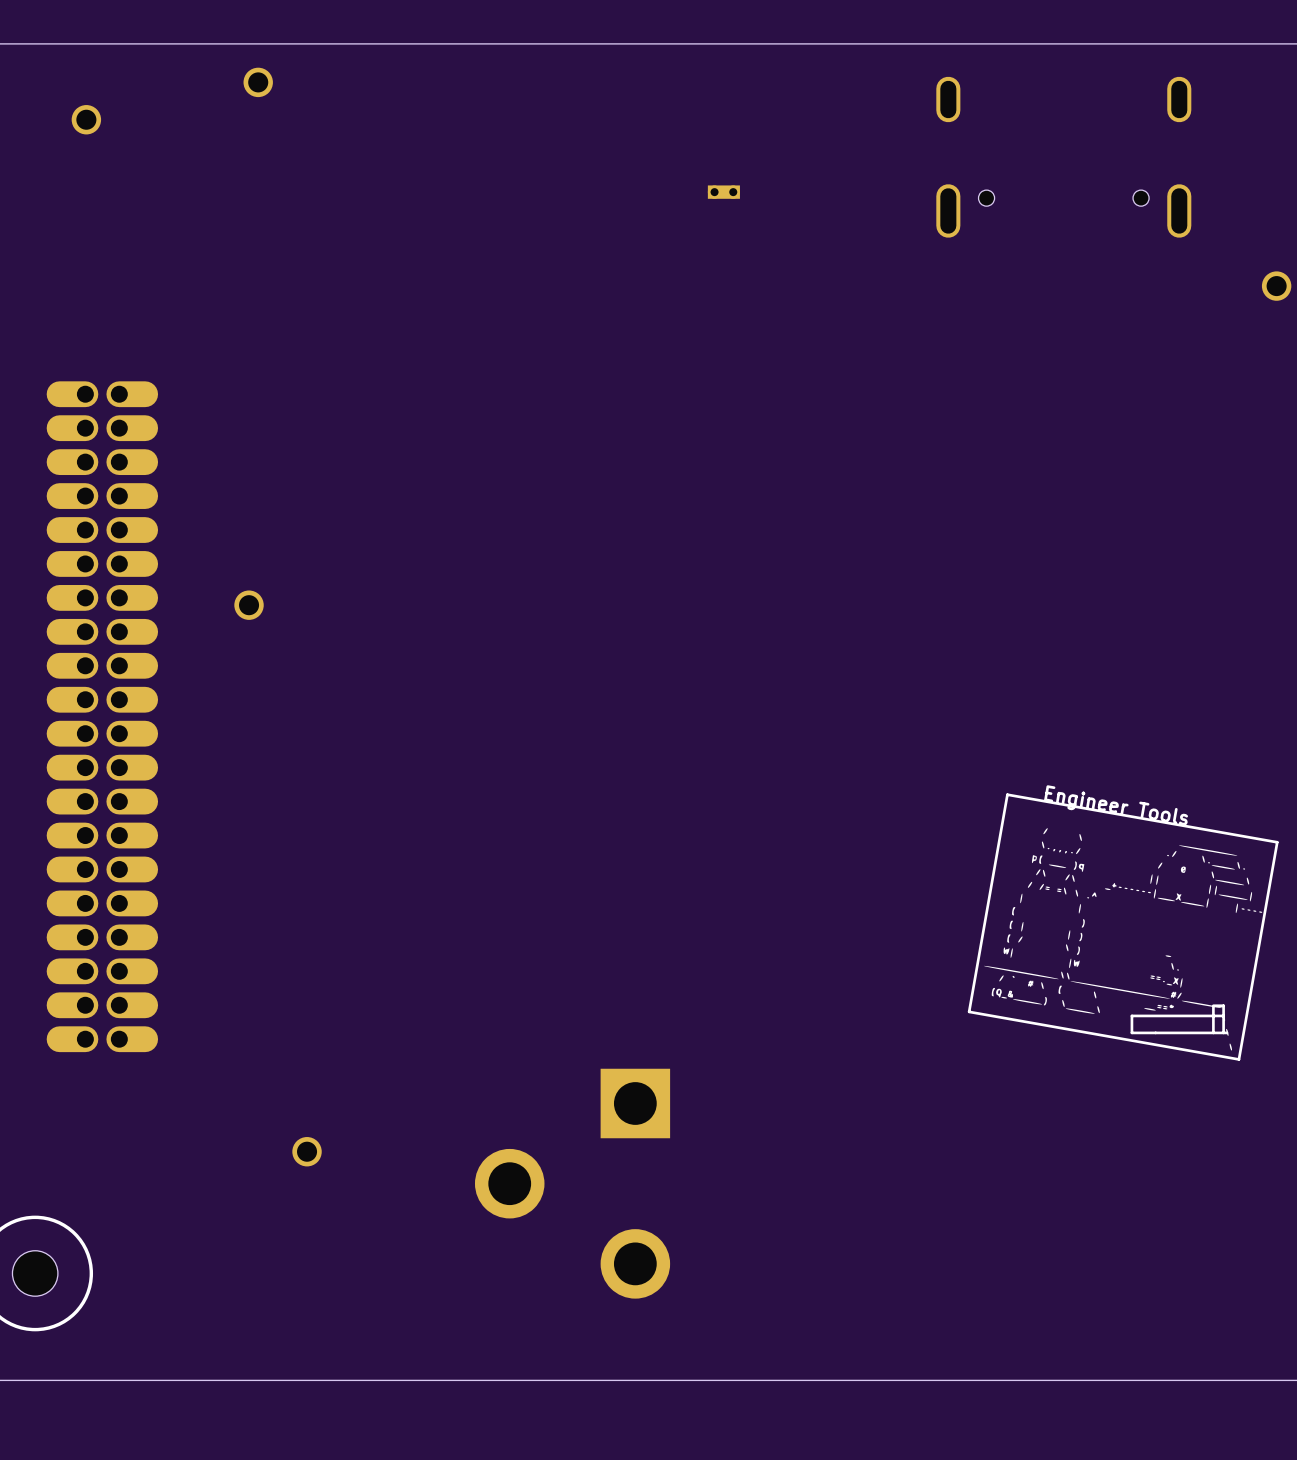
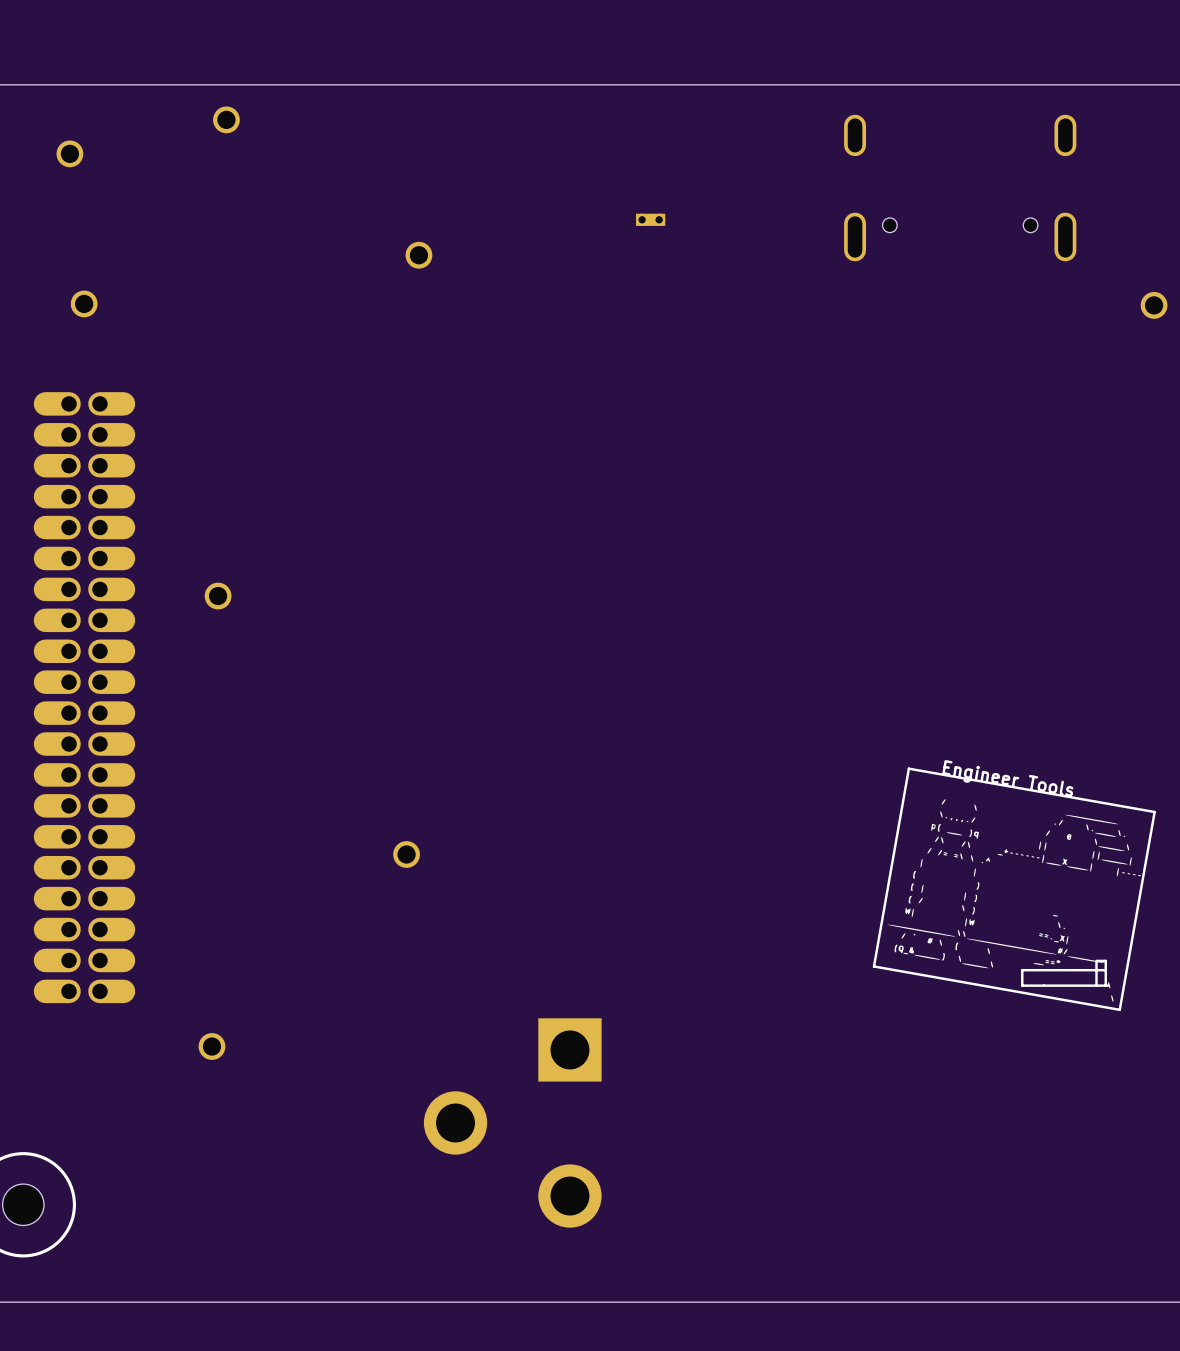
part: none -> (418, 255)
part: none -> (84, 303)
part: none -> (406, 854)
part position: (307, 1151) -> (211, 1046)

